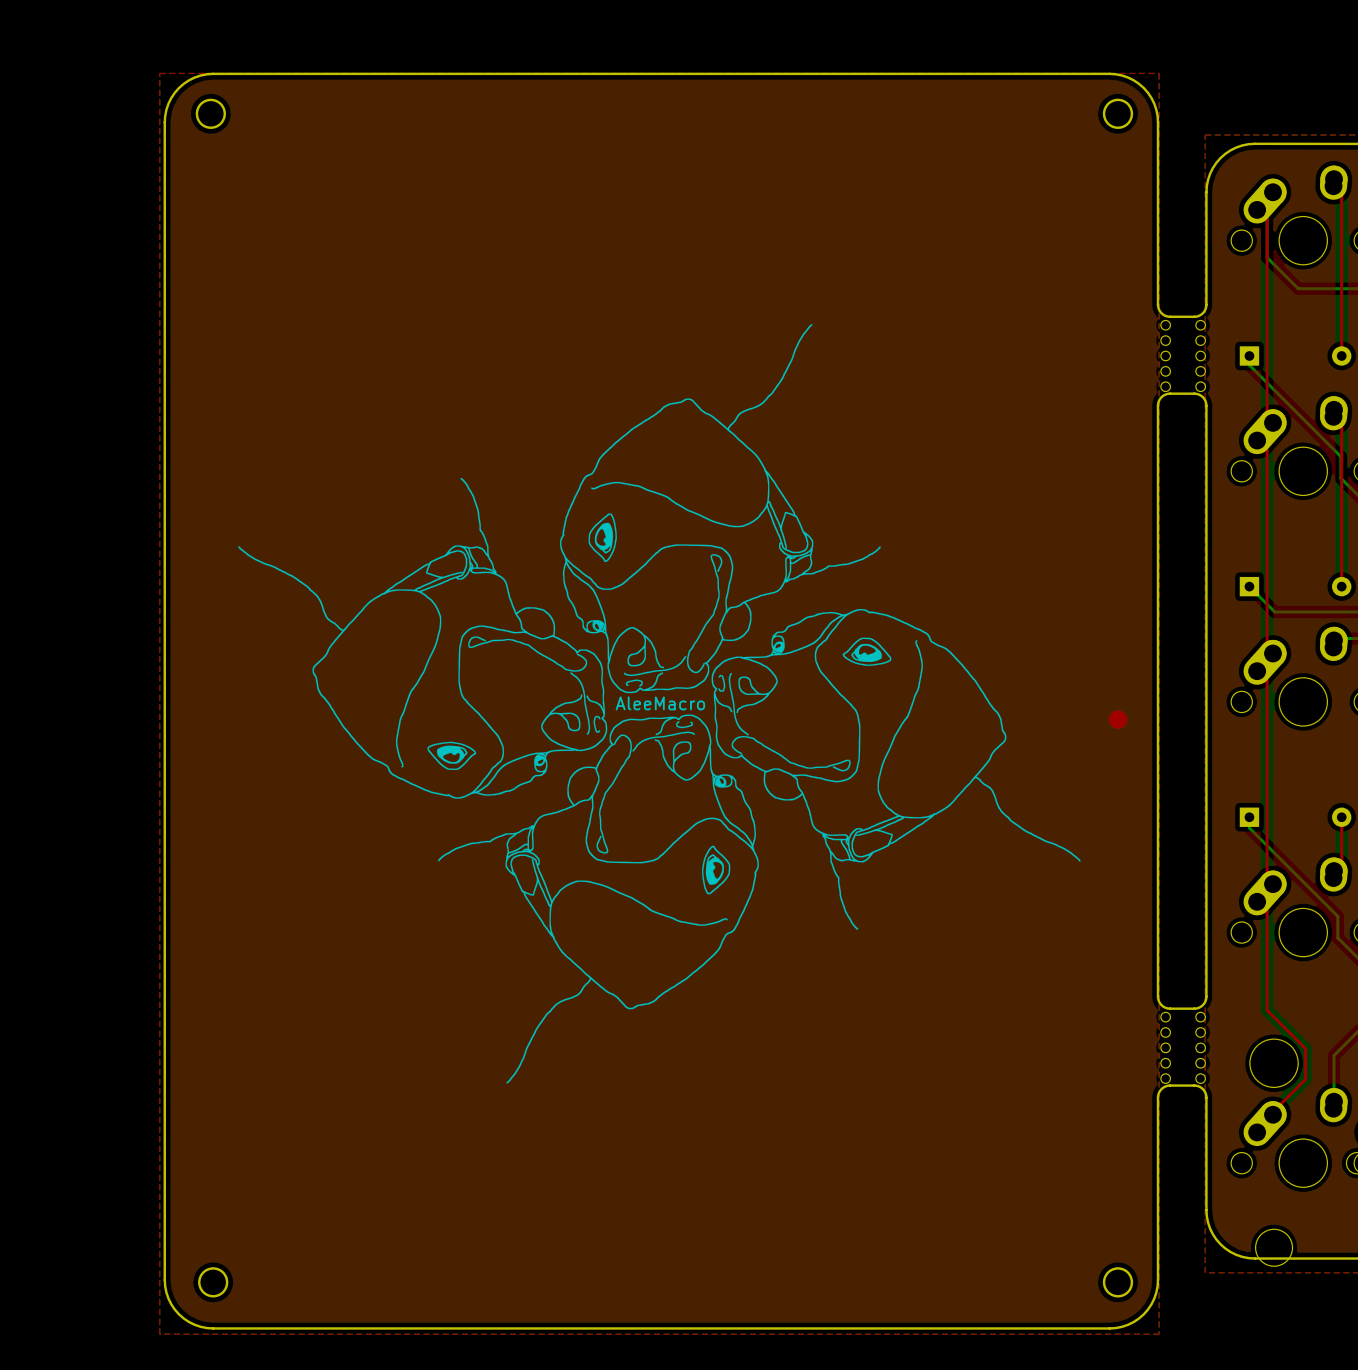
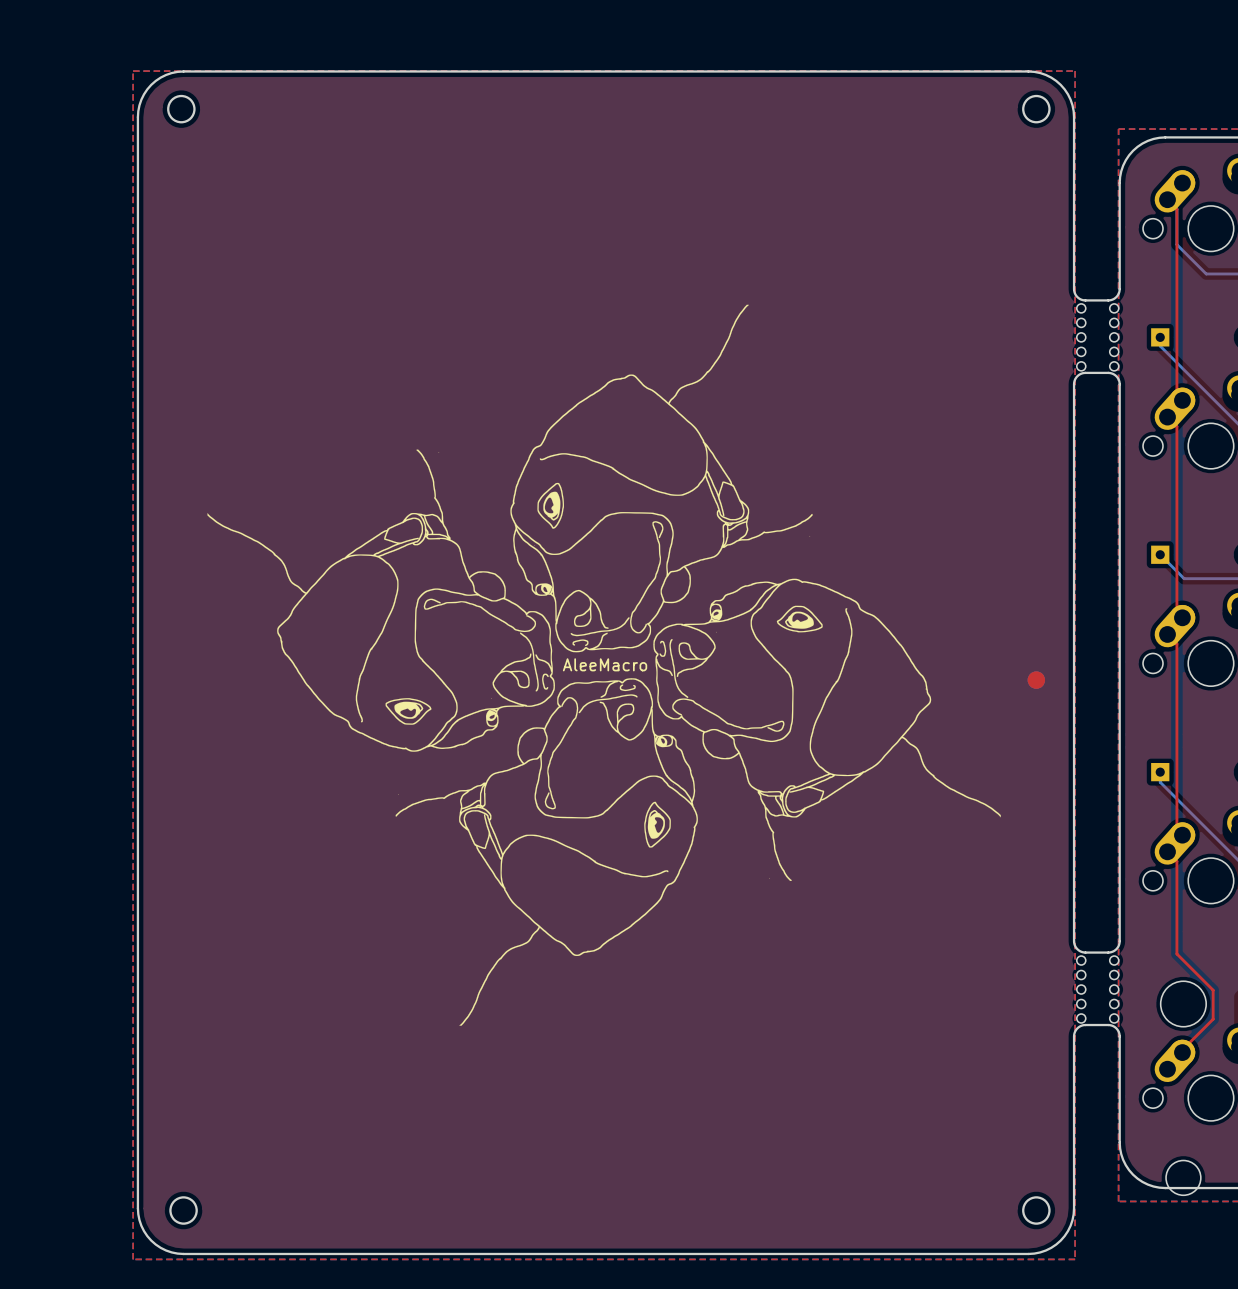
drawing shape: [559, 324, 881, 694] -> [510, 304, 813, 653]
drawing shape: [238, 478, 608, 799] -> [207, 449, 555, 752]
drawing shape: [711, 609, 1081, 930] -> [653, 578, 1001, 881]
drawing shape: [438, 714, 759, 1084] -> [395, 678, 698, 1026]

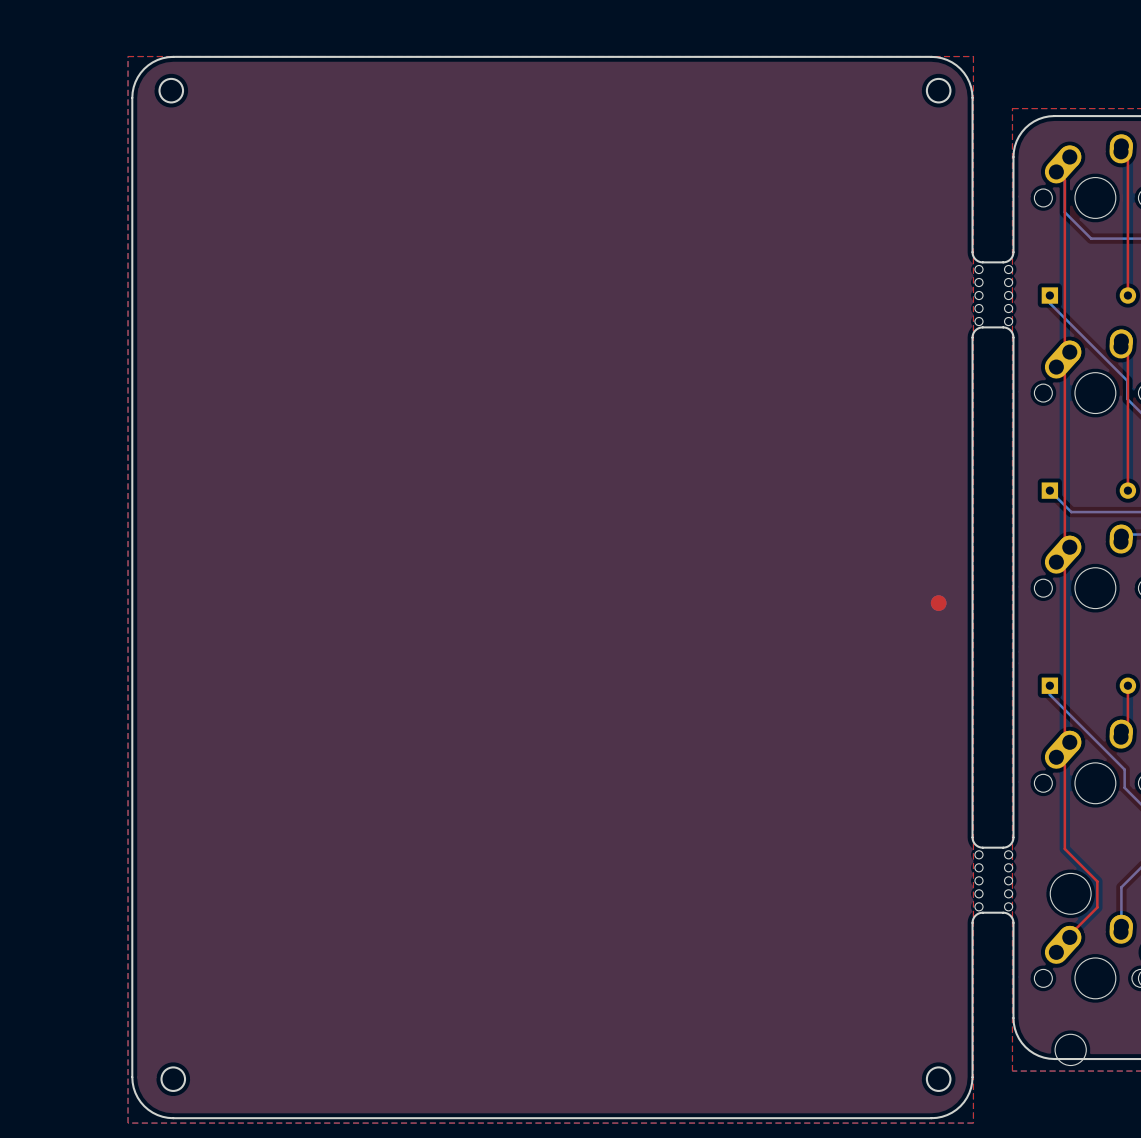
drawing: [207, 304, 1001, 1026] -> none
text: AleeMacro (605, 664) -> none

